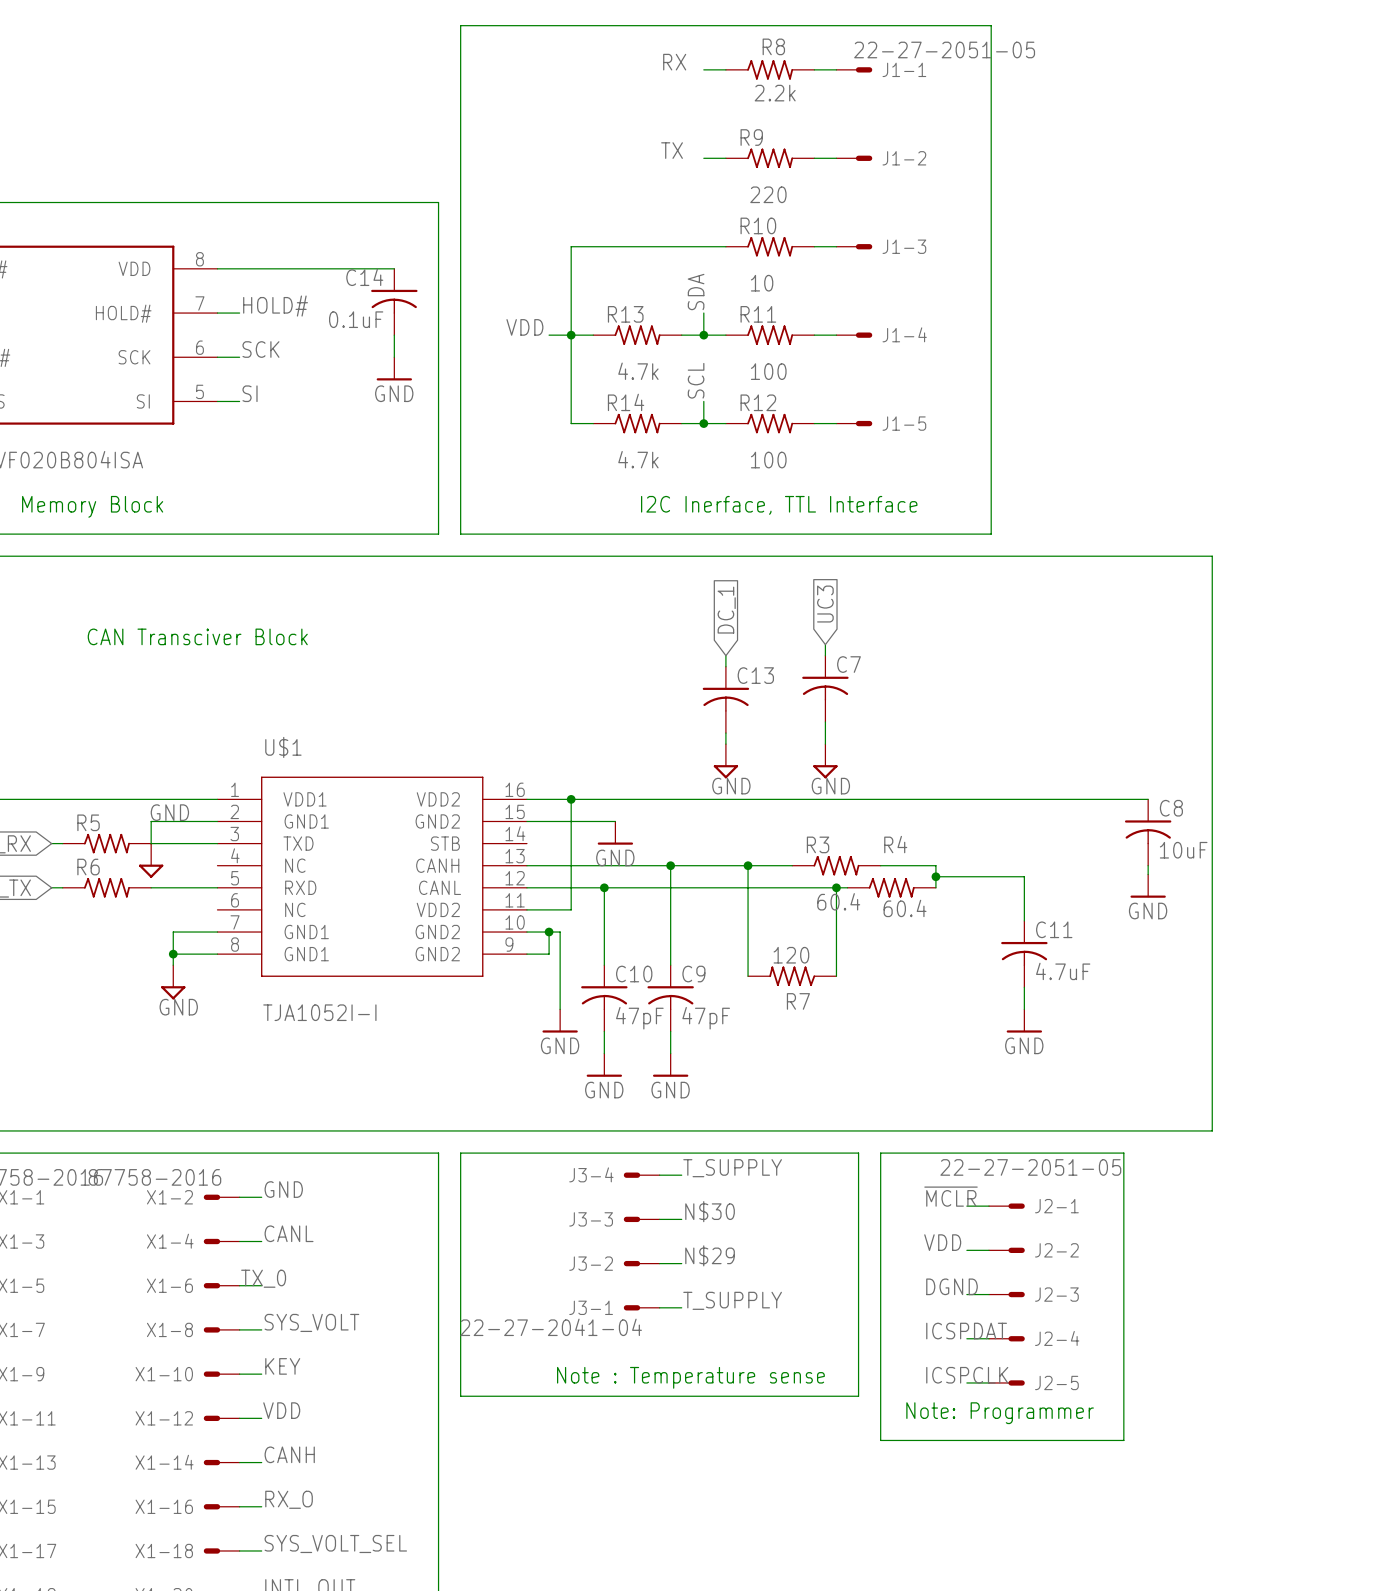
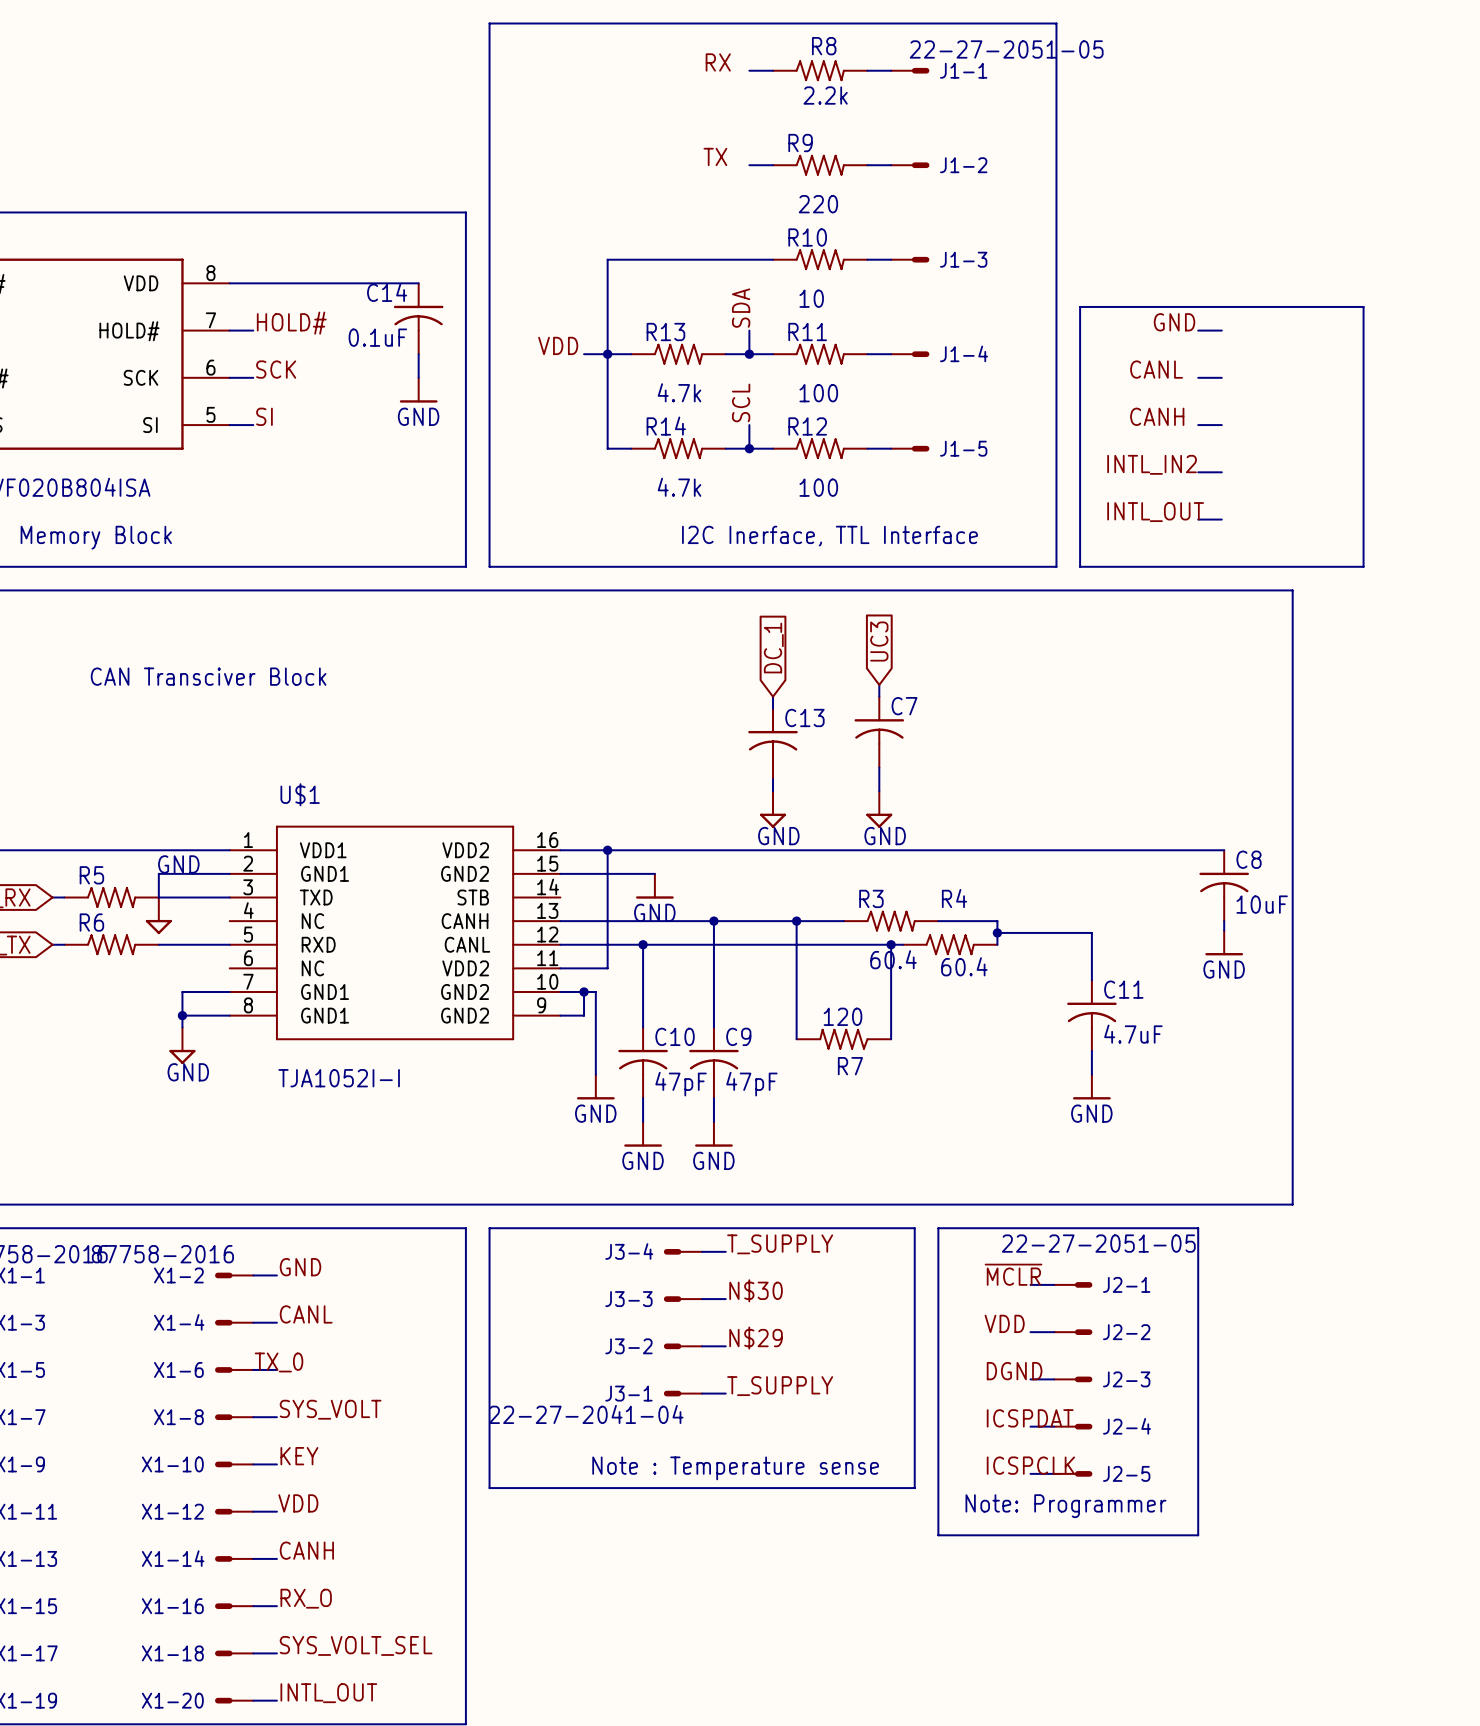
wire: none -> (1080, 306) (1080, 566) (1363, 566) (1363, 306) (1080, 306)
label: none -> GND (1174, 322)
wire: none -> (1198, 330) (1221, 330)
label: none -> CANL (1156, 369)
wire: none -> (1198, 377) (1221, 377)
label: none -> CANH (1157, 416)
wire: none -> (1198, 425) (1221, 425)
label: none -> INTL_IN2 (1152, 464)
wire: none -> (1198, 472) (1221, 472)
label: none -> INTL_OUT (1155, 512)
wire: none -> (1198, 519) (1221, 519)

